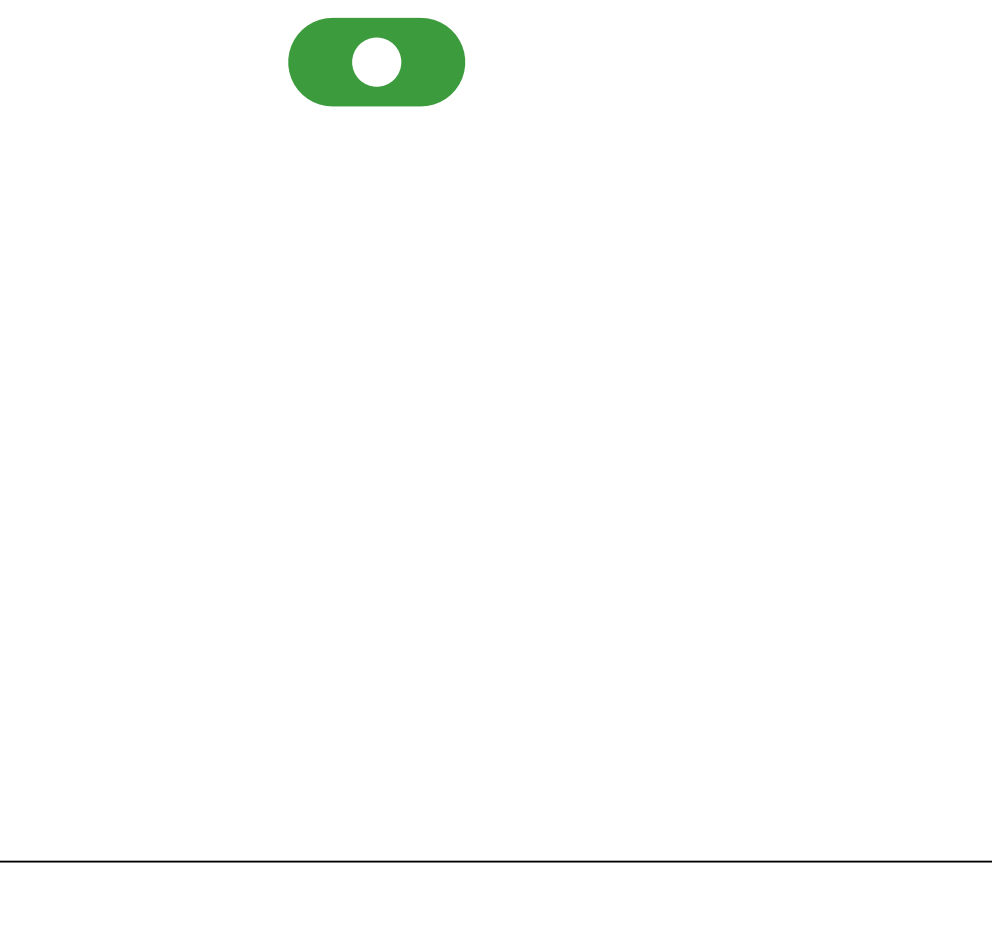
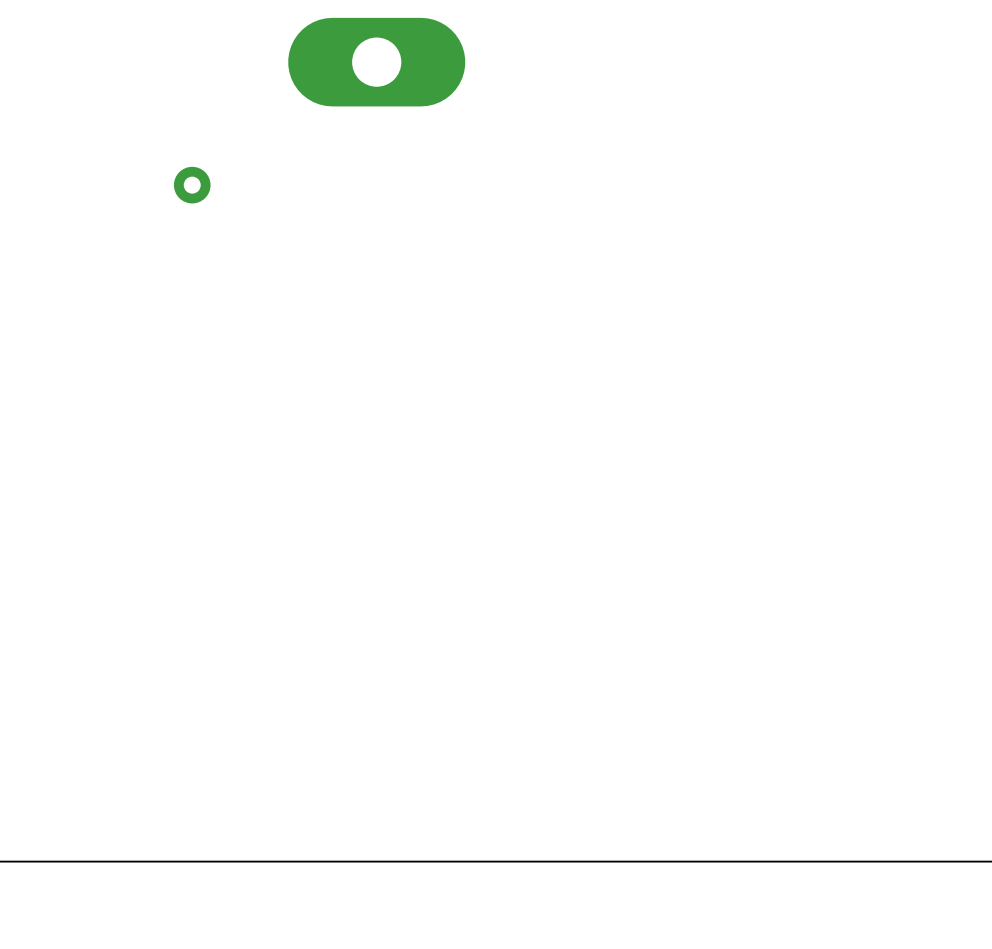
via: none -> (192, 185)

